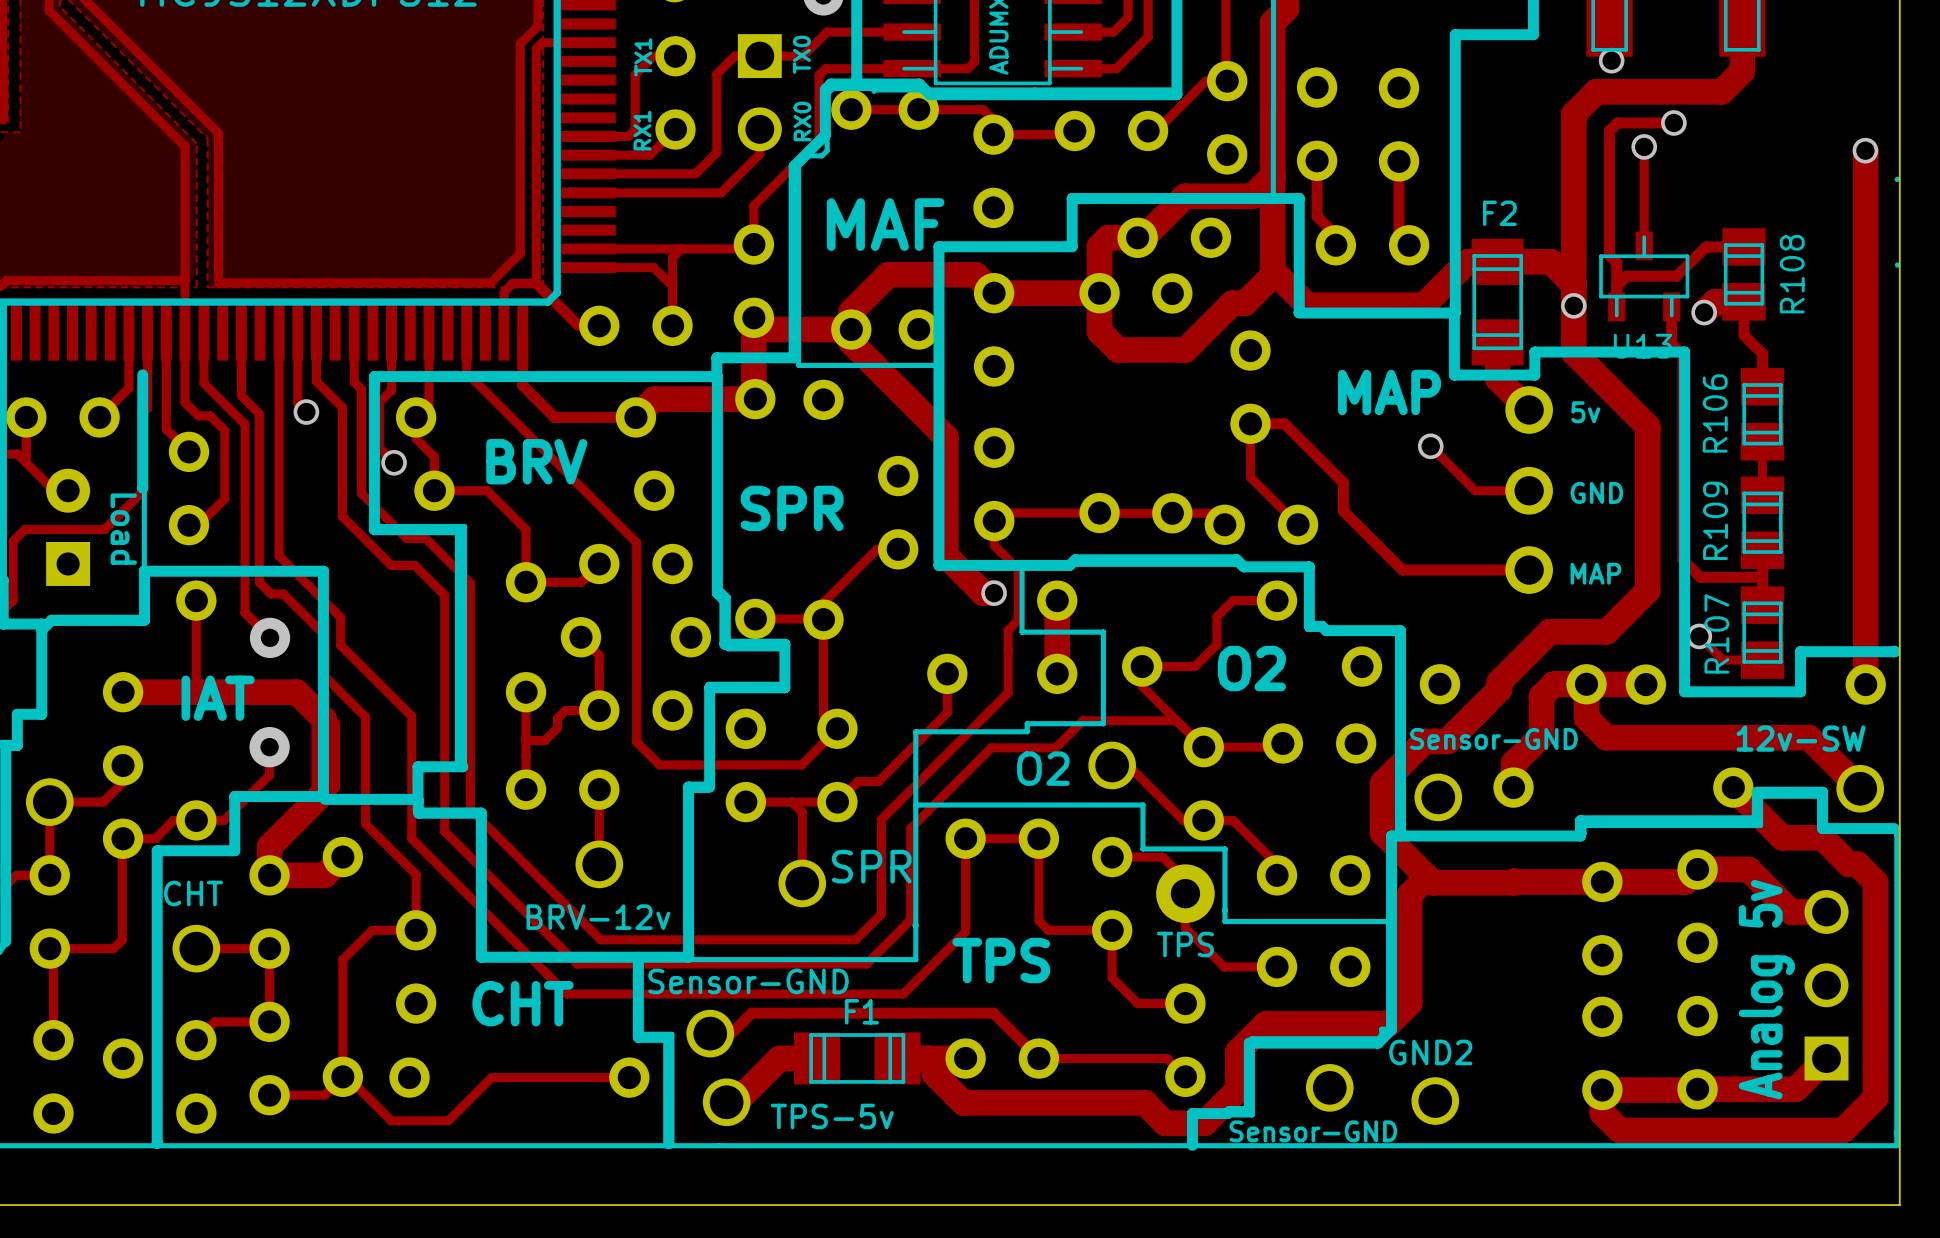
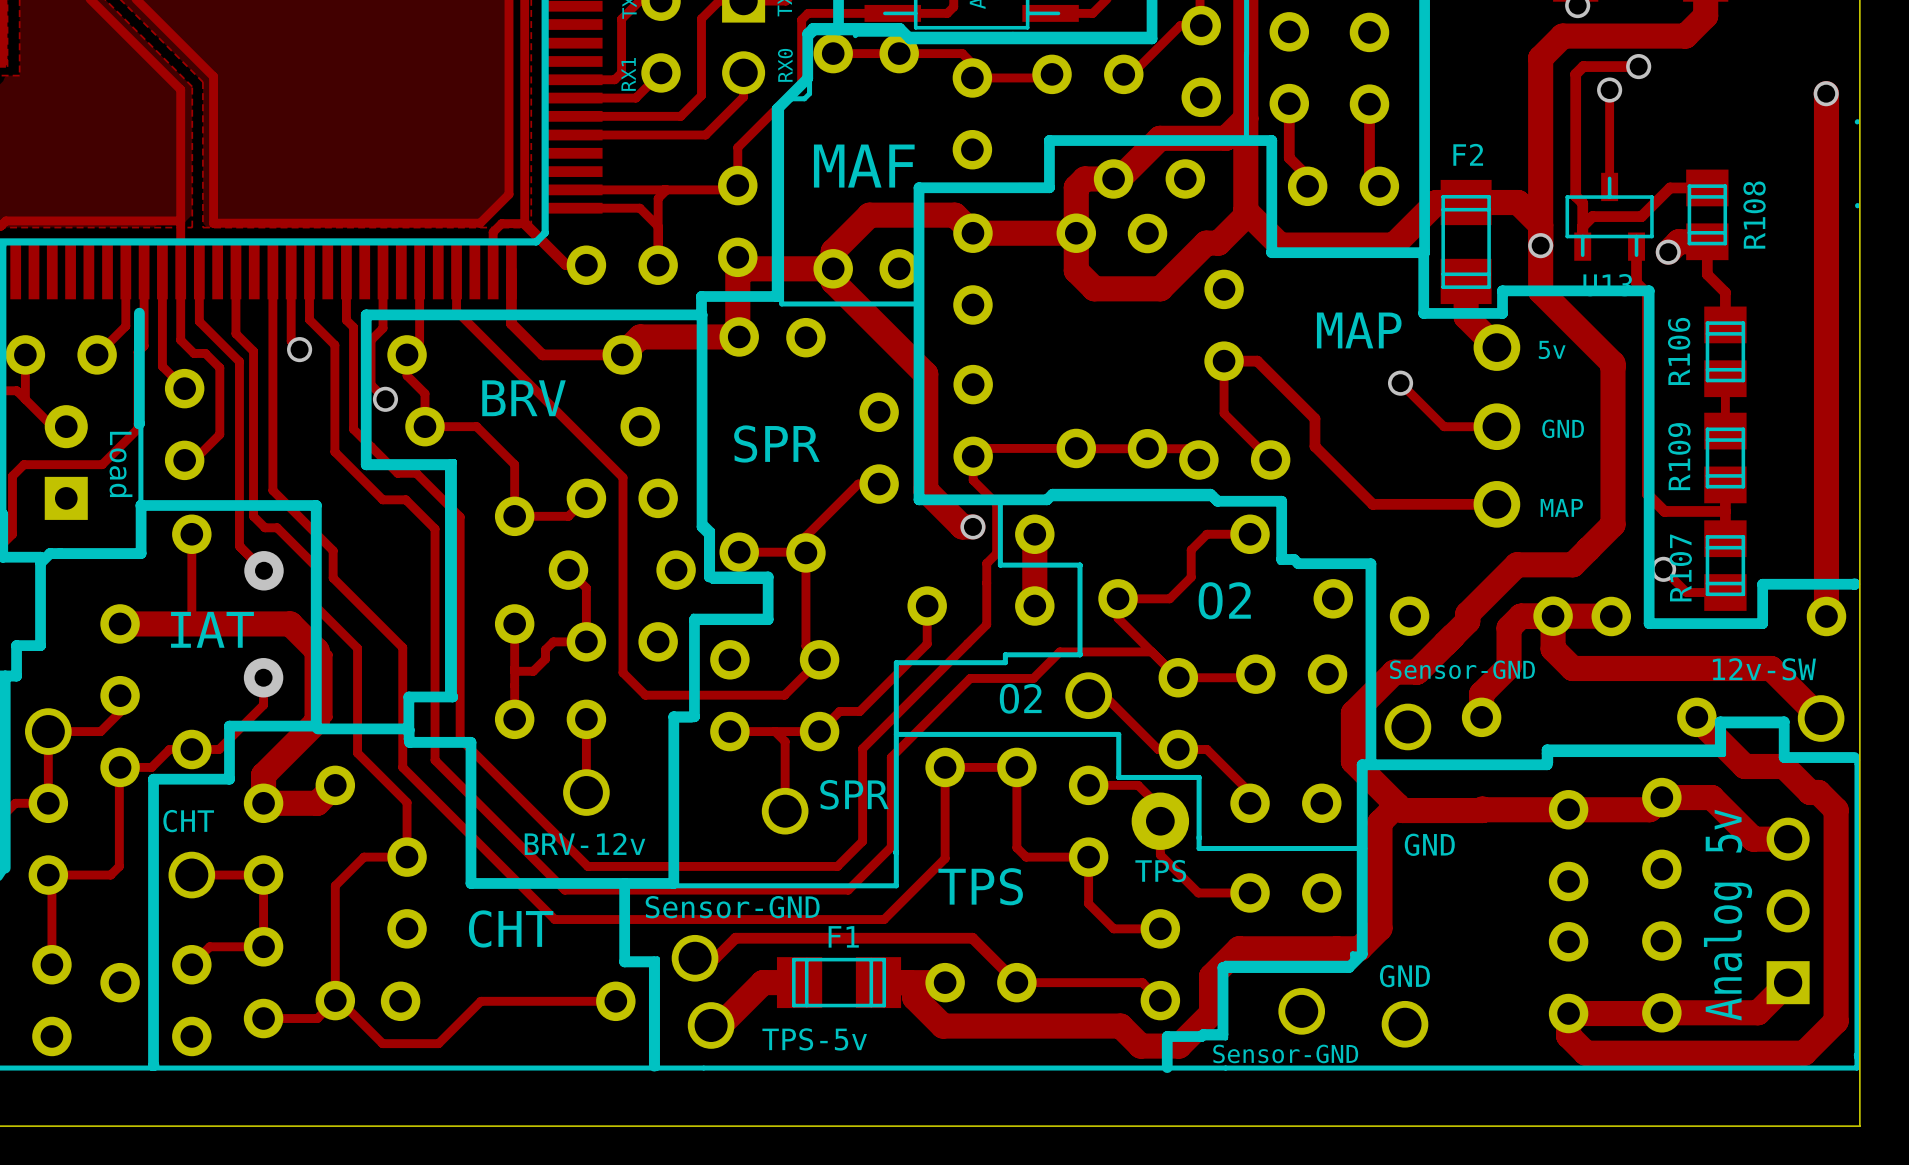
text: none -> GND (1429, 844)
text: GND2 (1430, 1052) -> GND (1404, 976)

